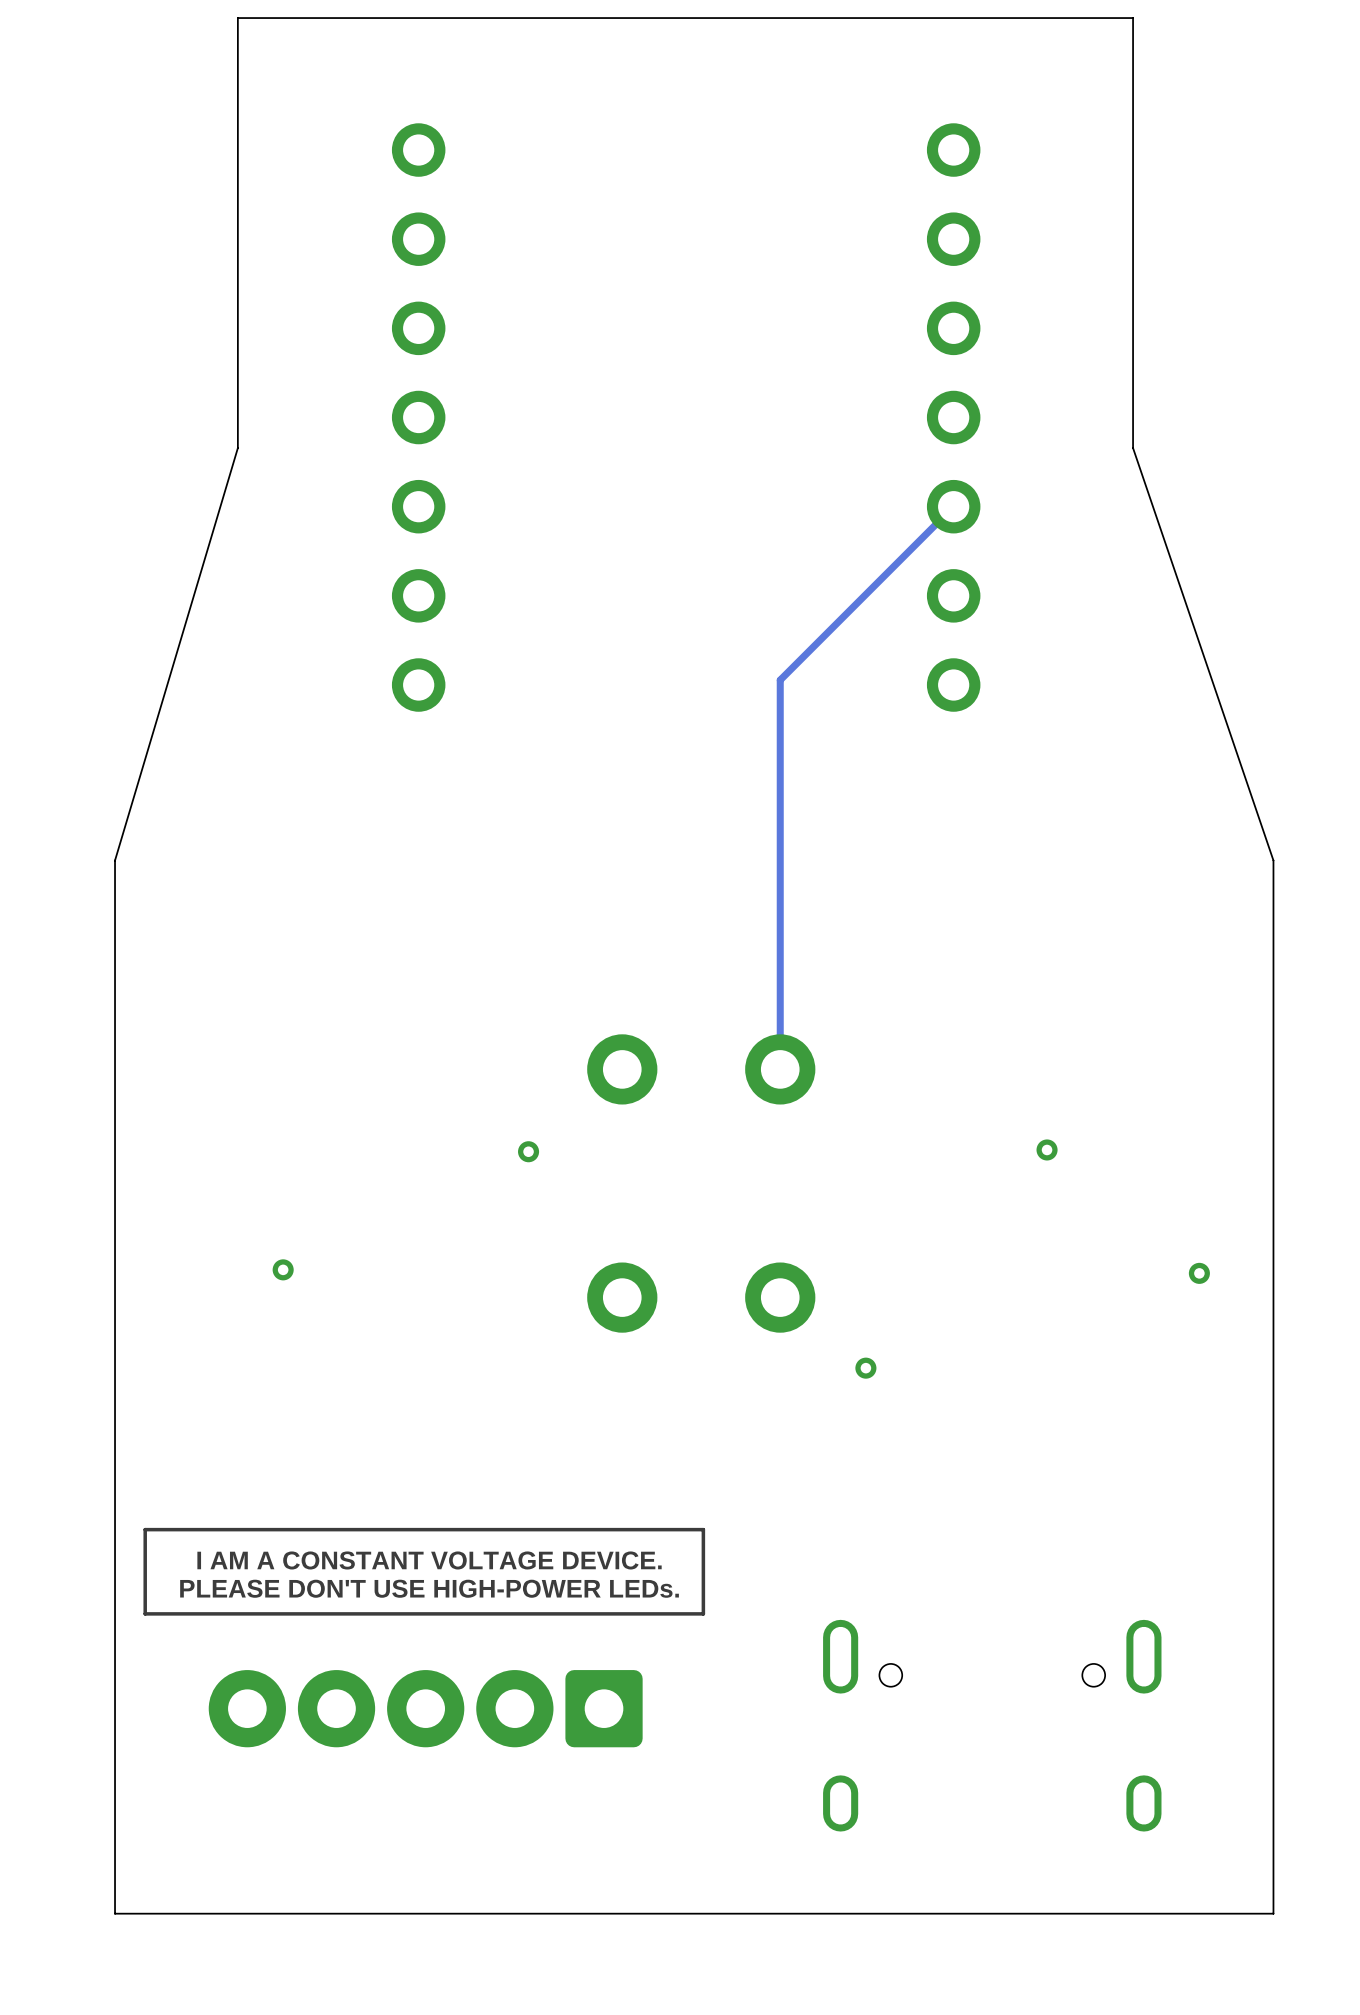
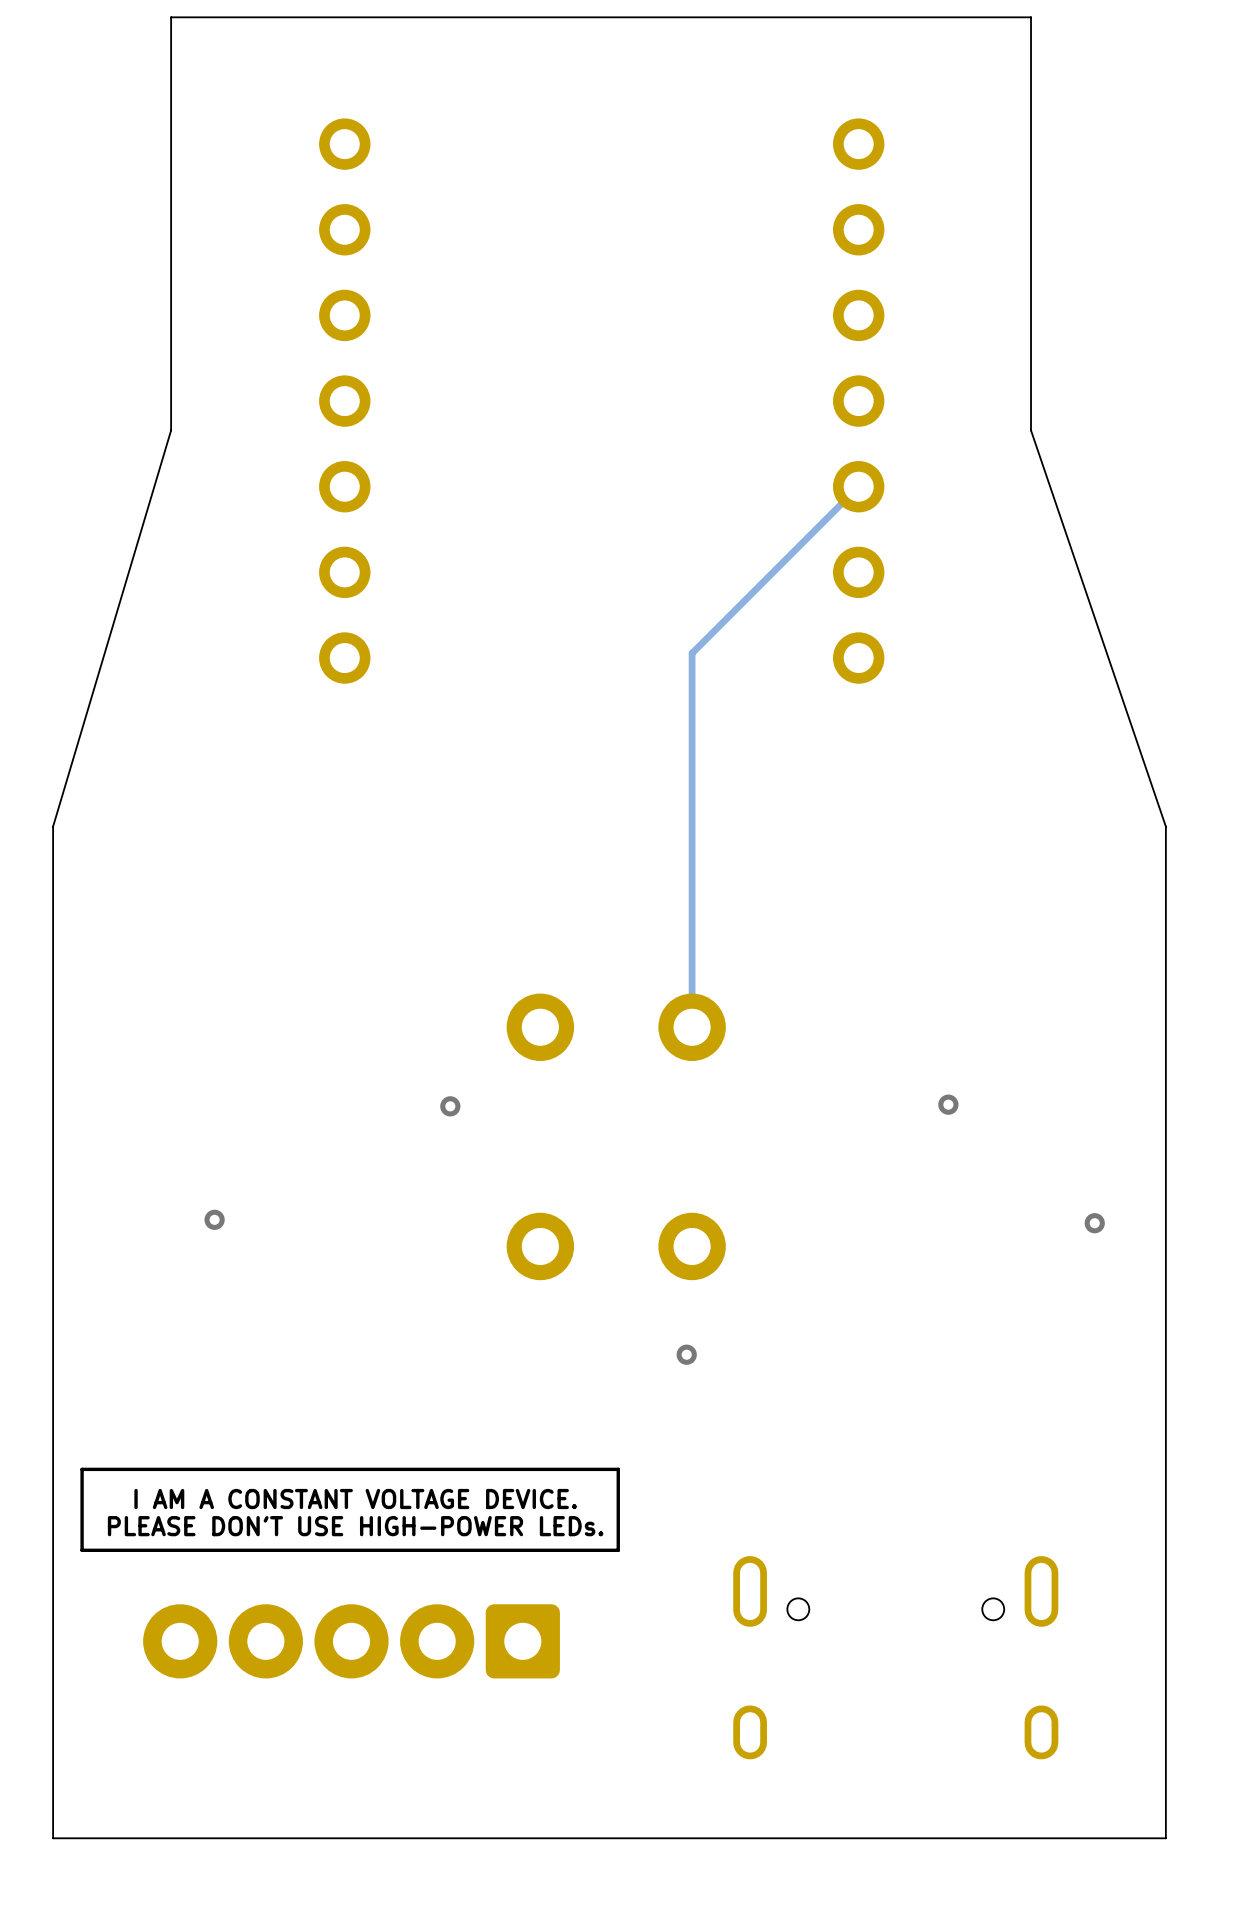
via position: (865, 1368) -> (686, 1354)

